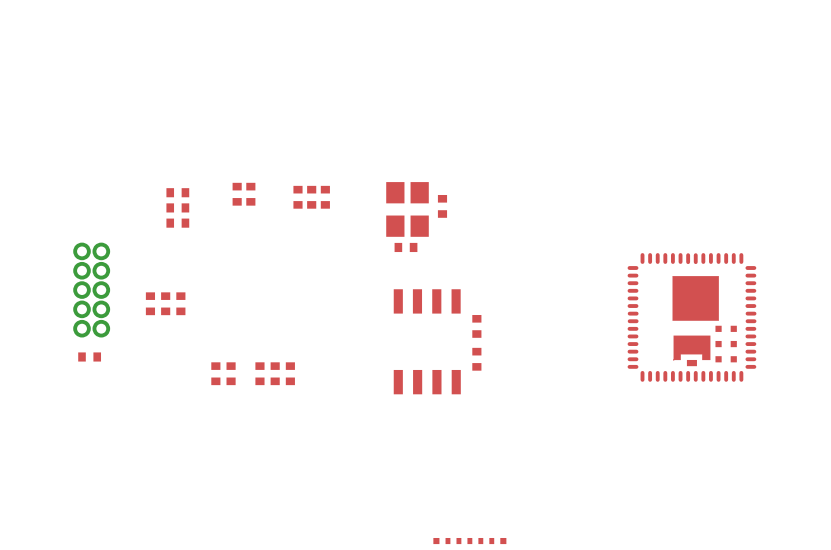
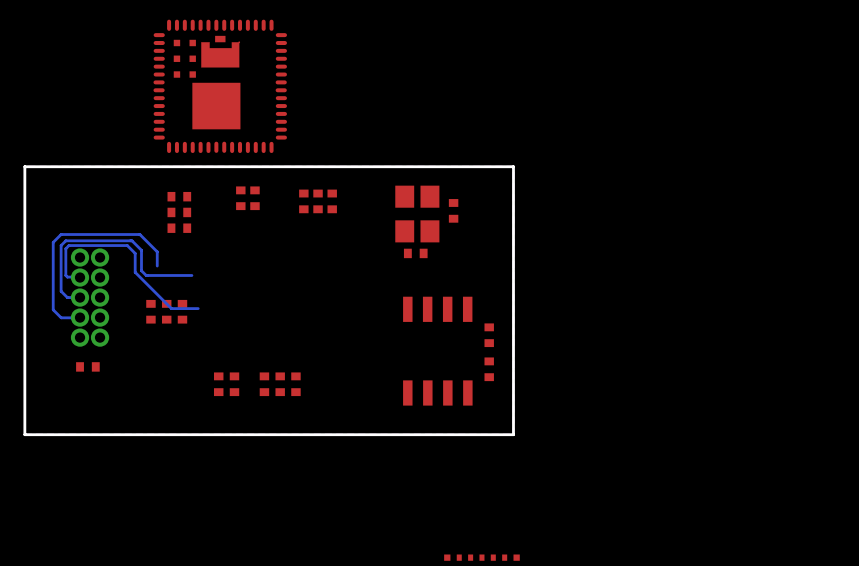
part: none -> (220, 86)
board edge: none -> (513, 166) (513, 434) (24, 434) (24, 166) (513, 166)
bottom track: none -> (157, 266) (157, 251) (139, 234) (61, 234) (53, 242) (53, 309) (61, 317) (80, 317)
bottom track: none -> (191, 275) (146, 275) (141, 270) (141, 250) (132, 240) (65, 240) (61, 245) (61, 291) (67, 297) (80, 297)
bottom track: none -> (80, 277) (65, 275) (65, 248) (68, 245) (127, 245) (135, 253) (135, 272) (171, 308) (198, 308)
part: (692, 317) -> none

